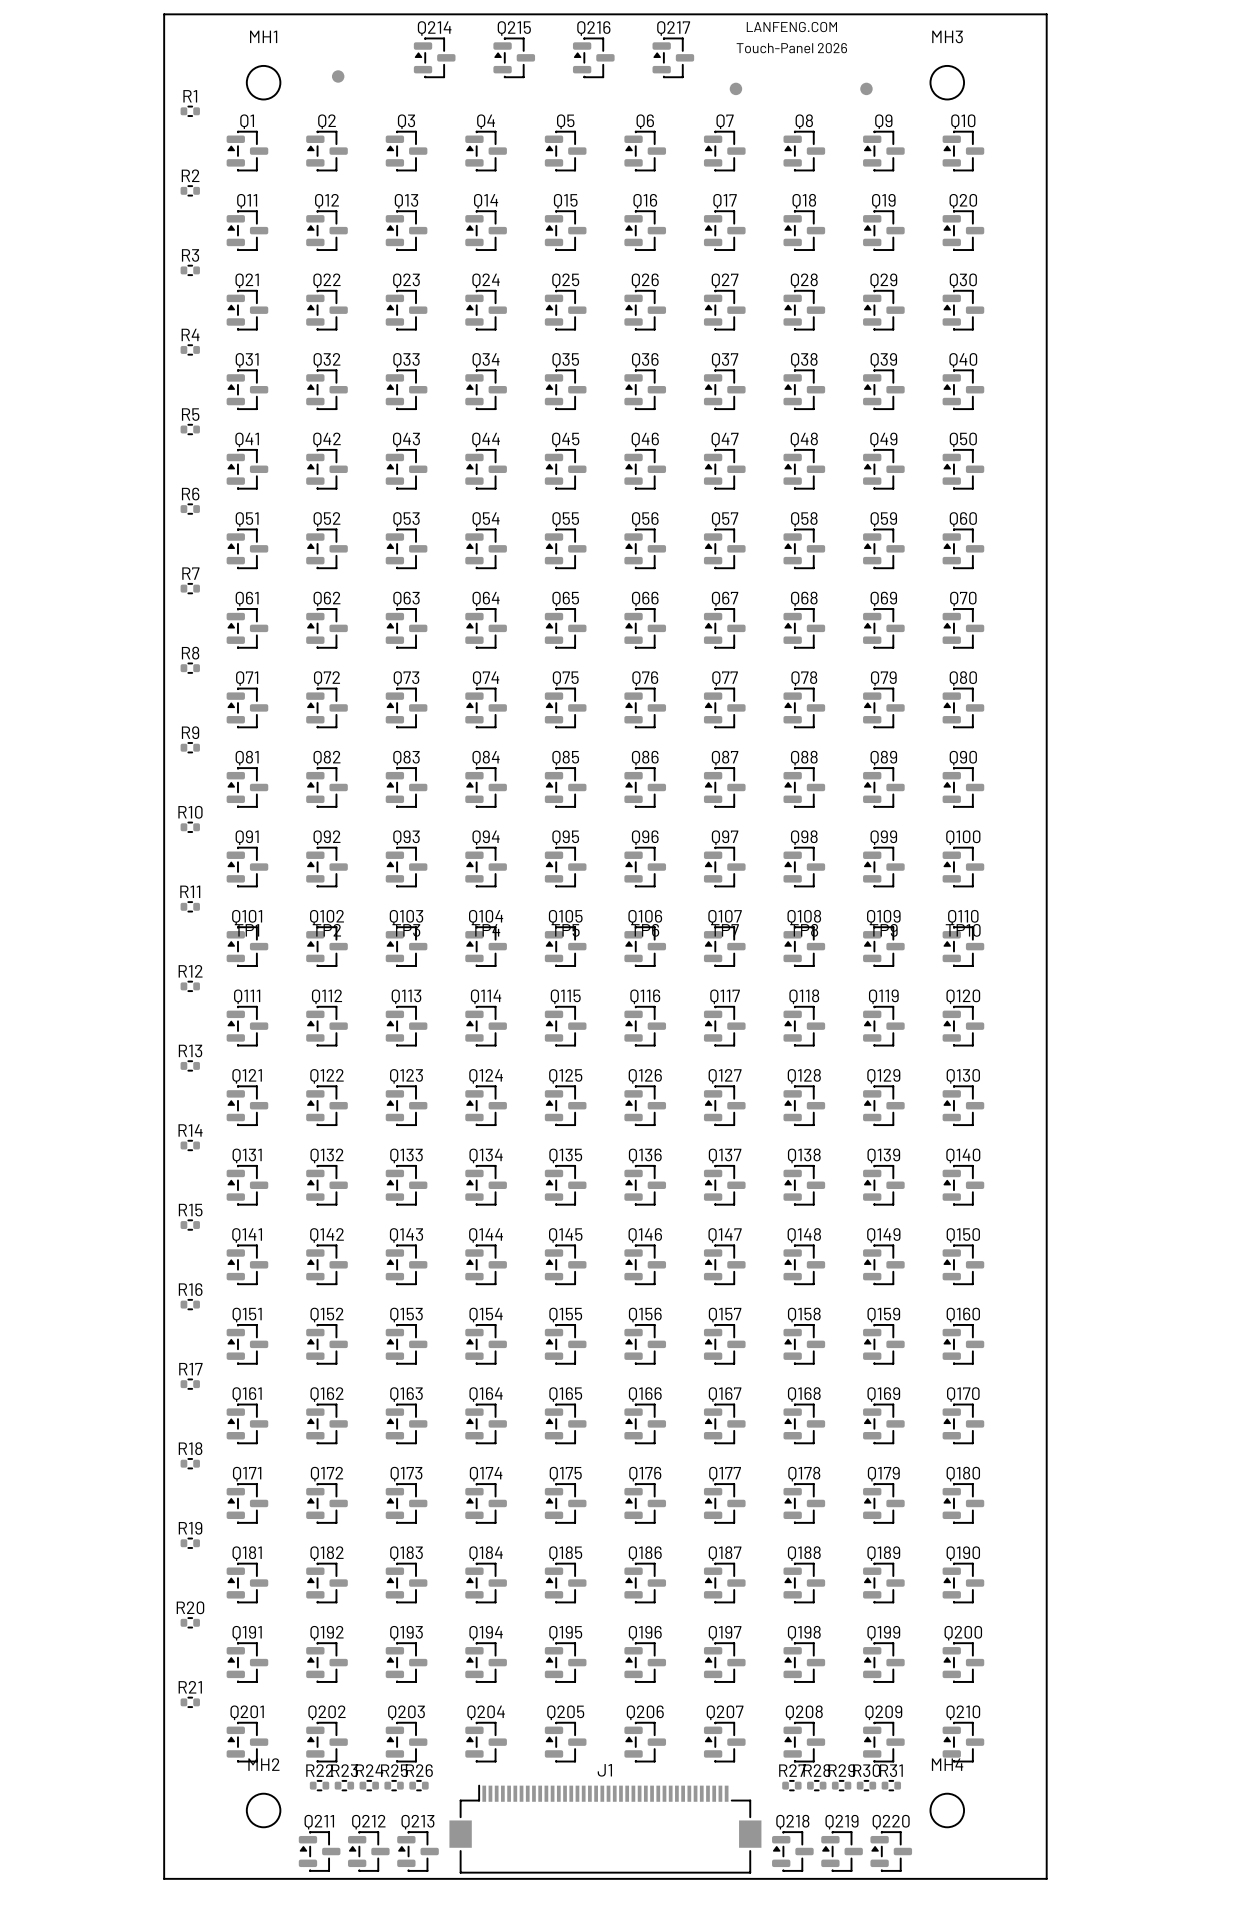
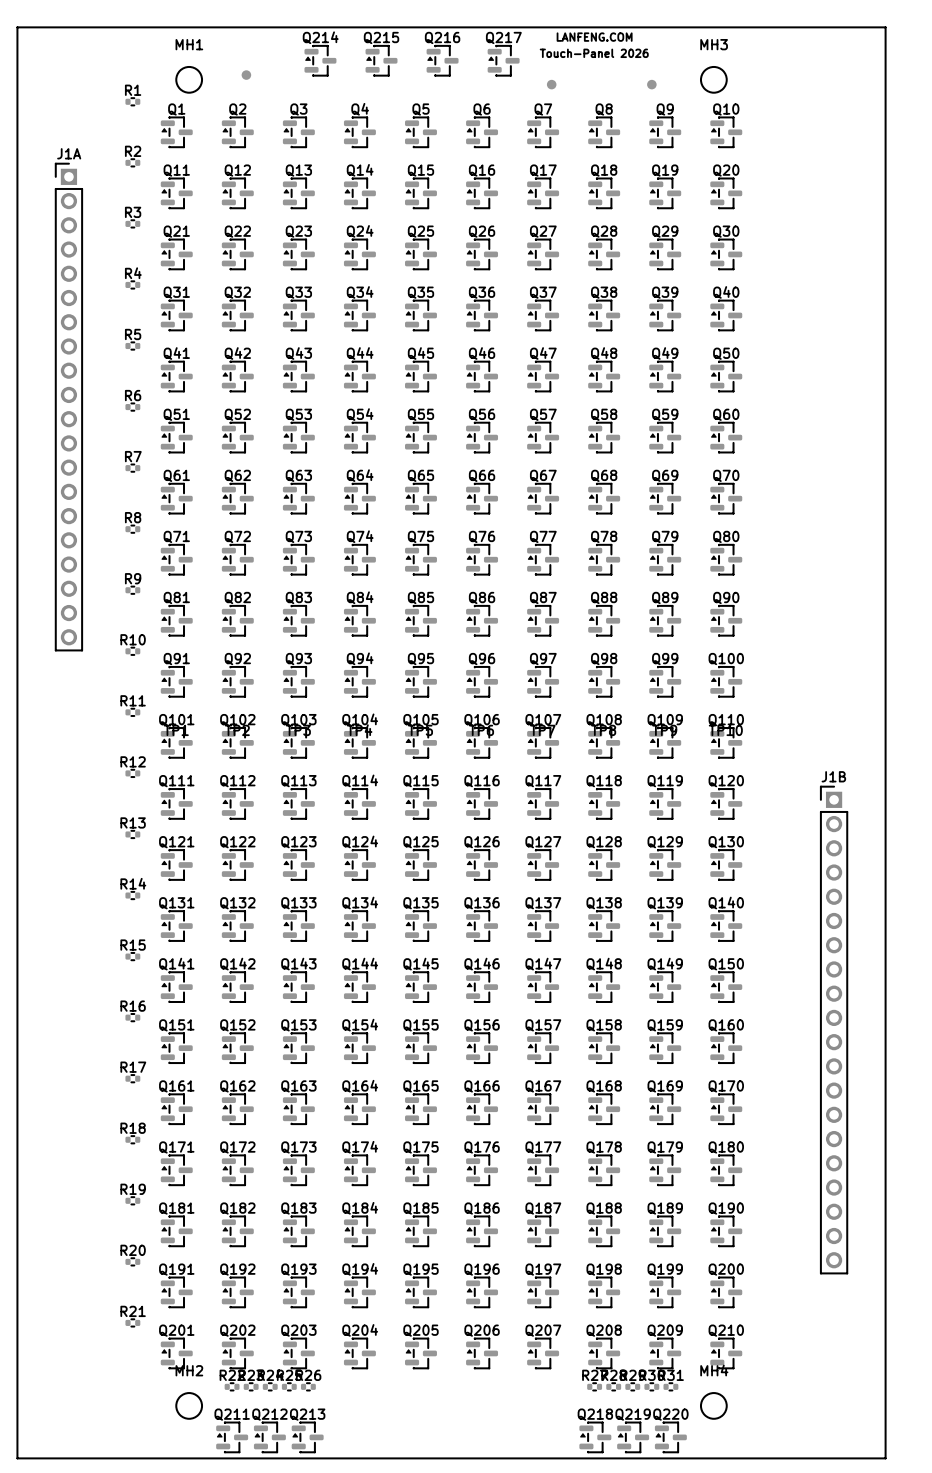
board edge: (164, 14) (164, 1878) -> (112, 27) (17, 27) (17, 1458) (112, 1458)
board edge: (1046, 14) (1046, 1878) -> (790, 27) (885, 27) (885, 1458) (790, 1458)
J1A: none -> (68, 407)
J1B: none -> (834, 1030)
J1: (605, 1829) -> none

